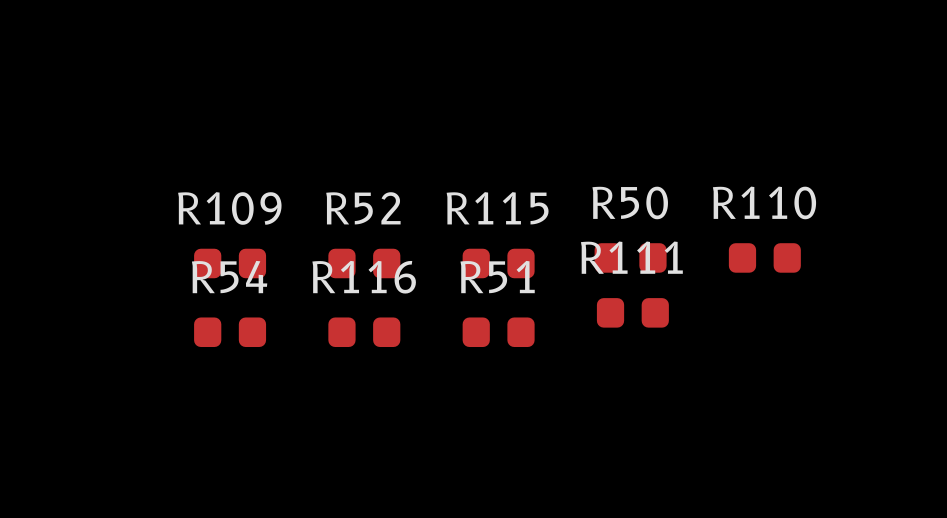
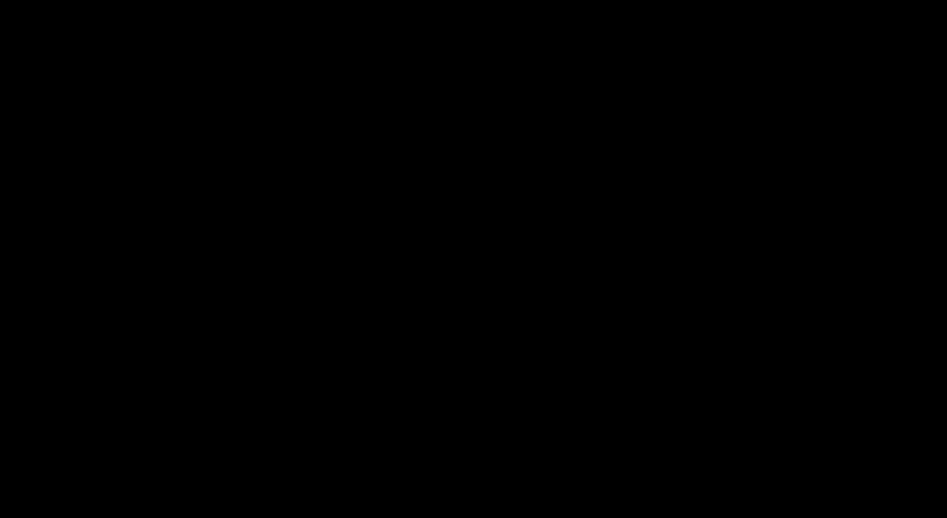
R50: (630, 257) -> none
R110: (764, 257) -> none
R109: (230, 263) -> none
R52: (364, 263) -> none
R115: (498, 263) -> none
R111: (632, 312) -> none
R54: (230, 332) -> none
R116: (364, 332) -> none
R51: (498, 332) -> none

